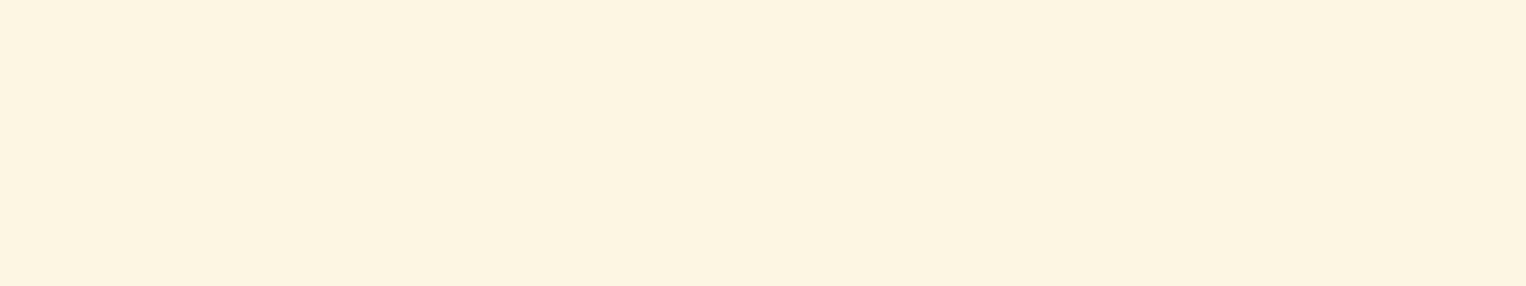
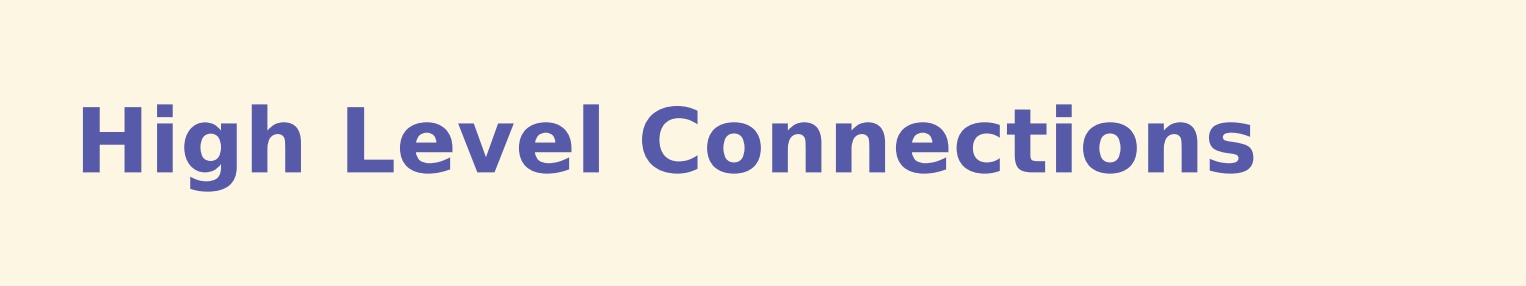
text: none -> High Level Connections (668, 148)

